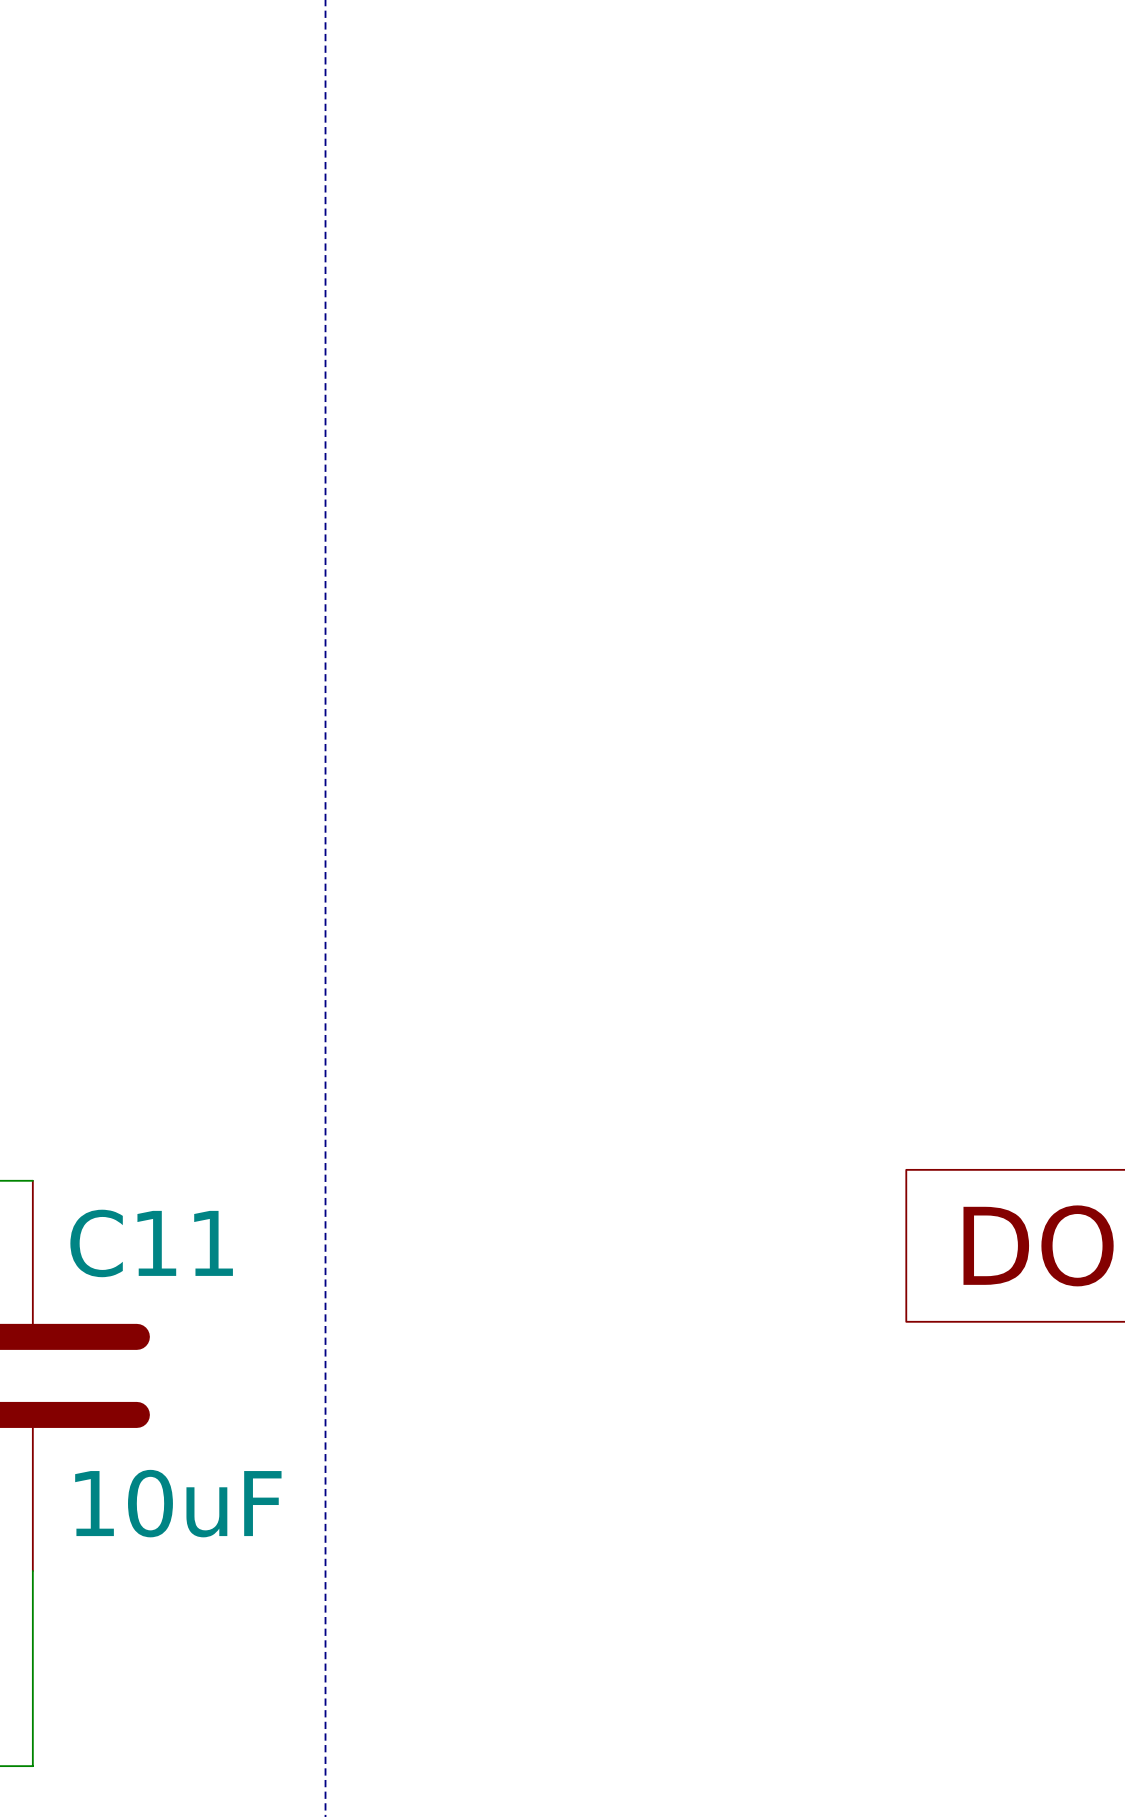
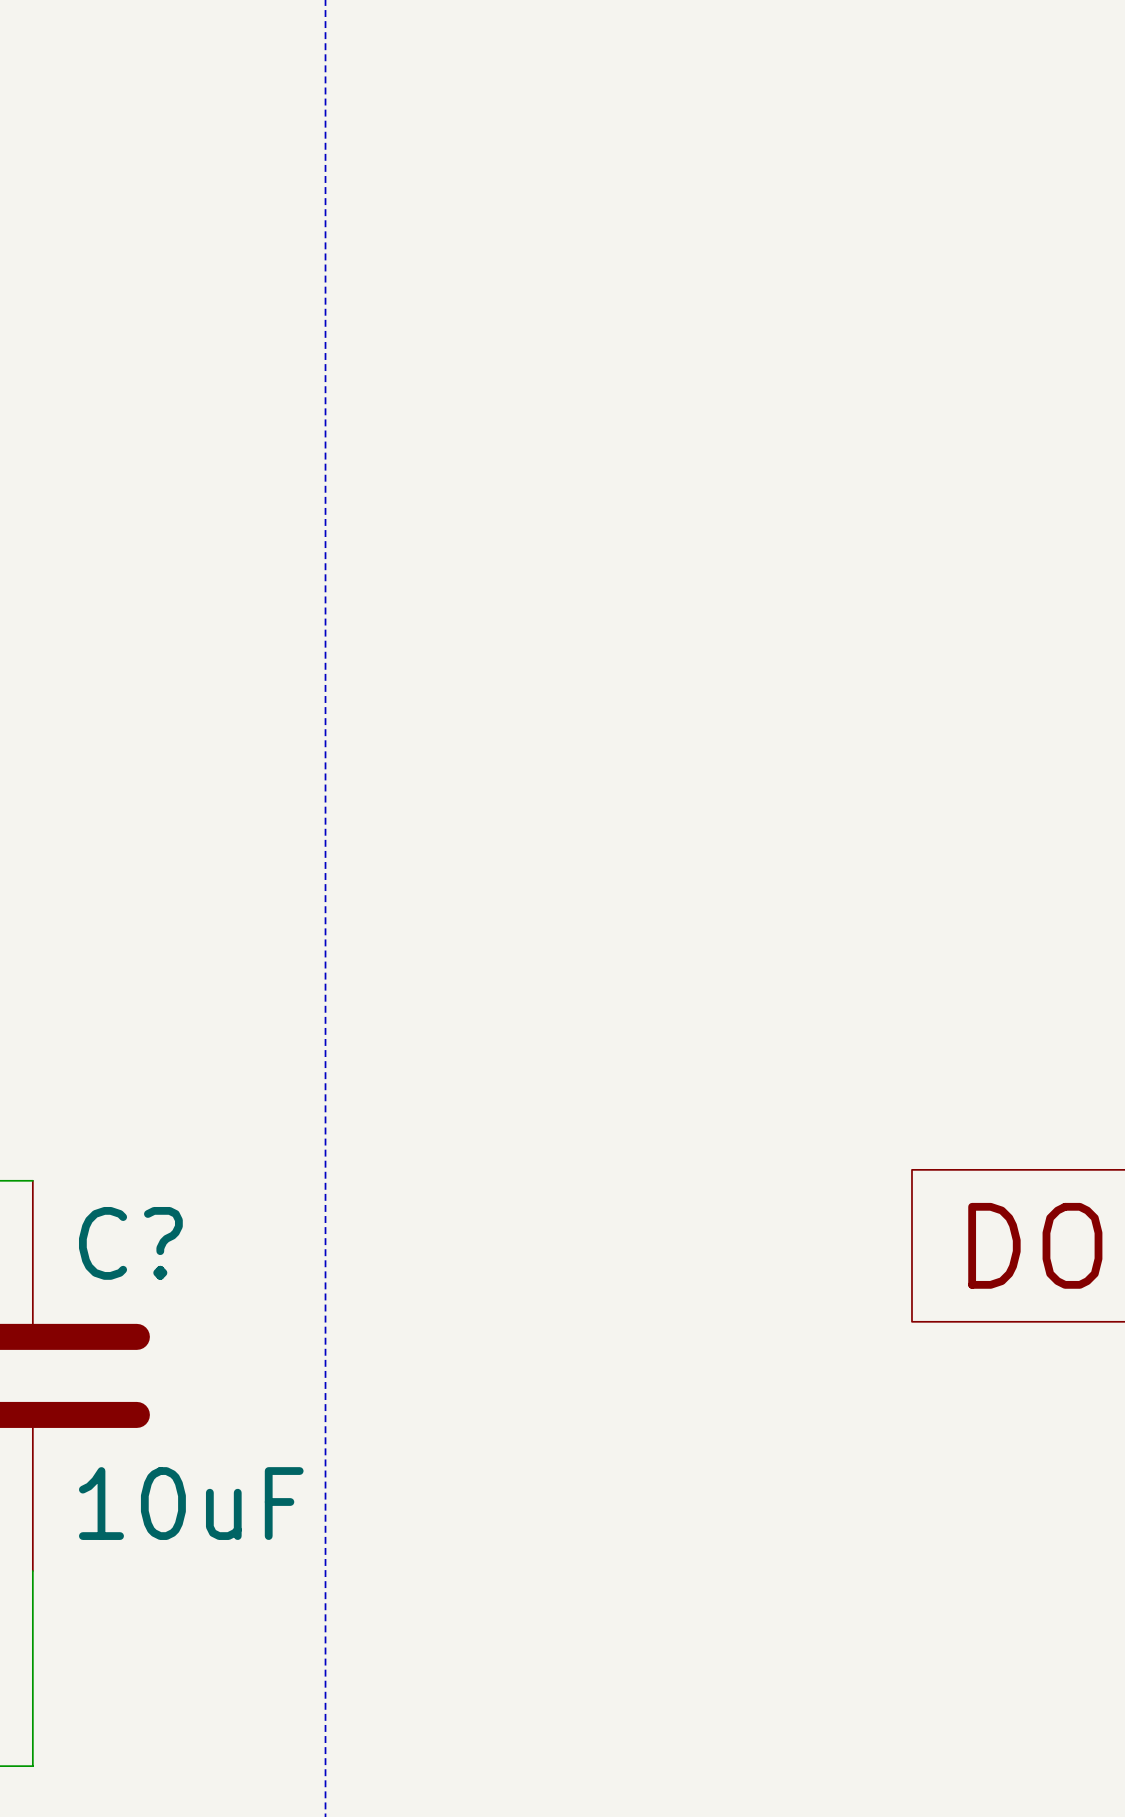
C11 name: C11 (151, 1243) -> C? (130, 1243)

